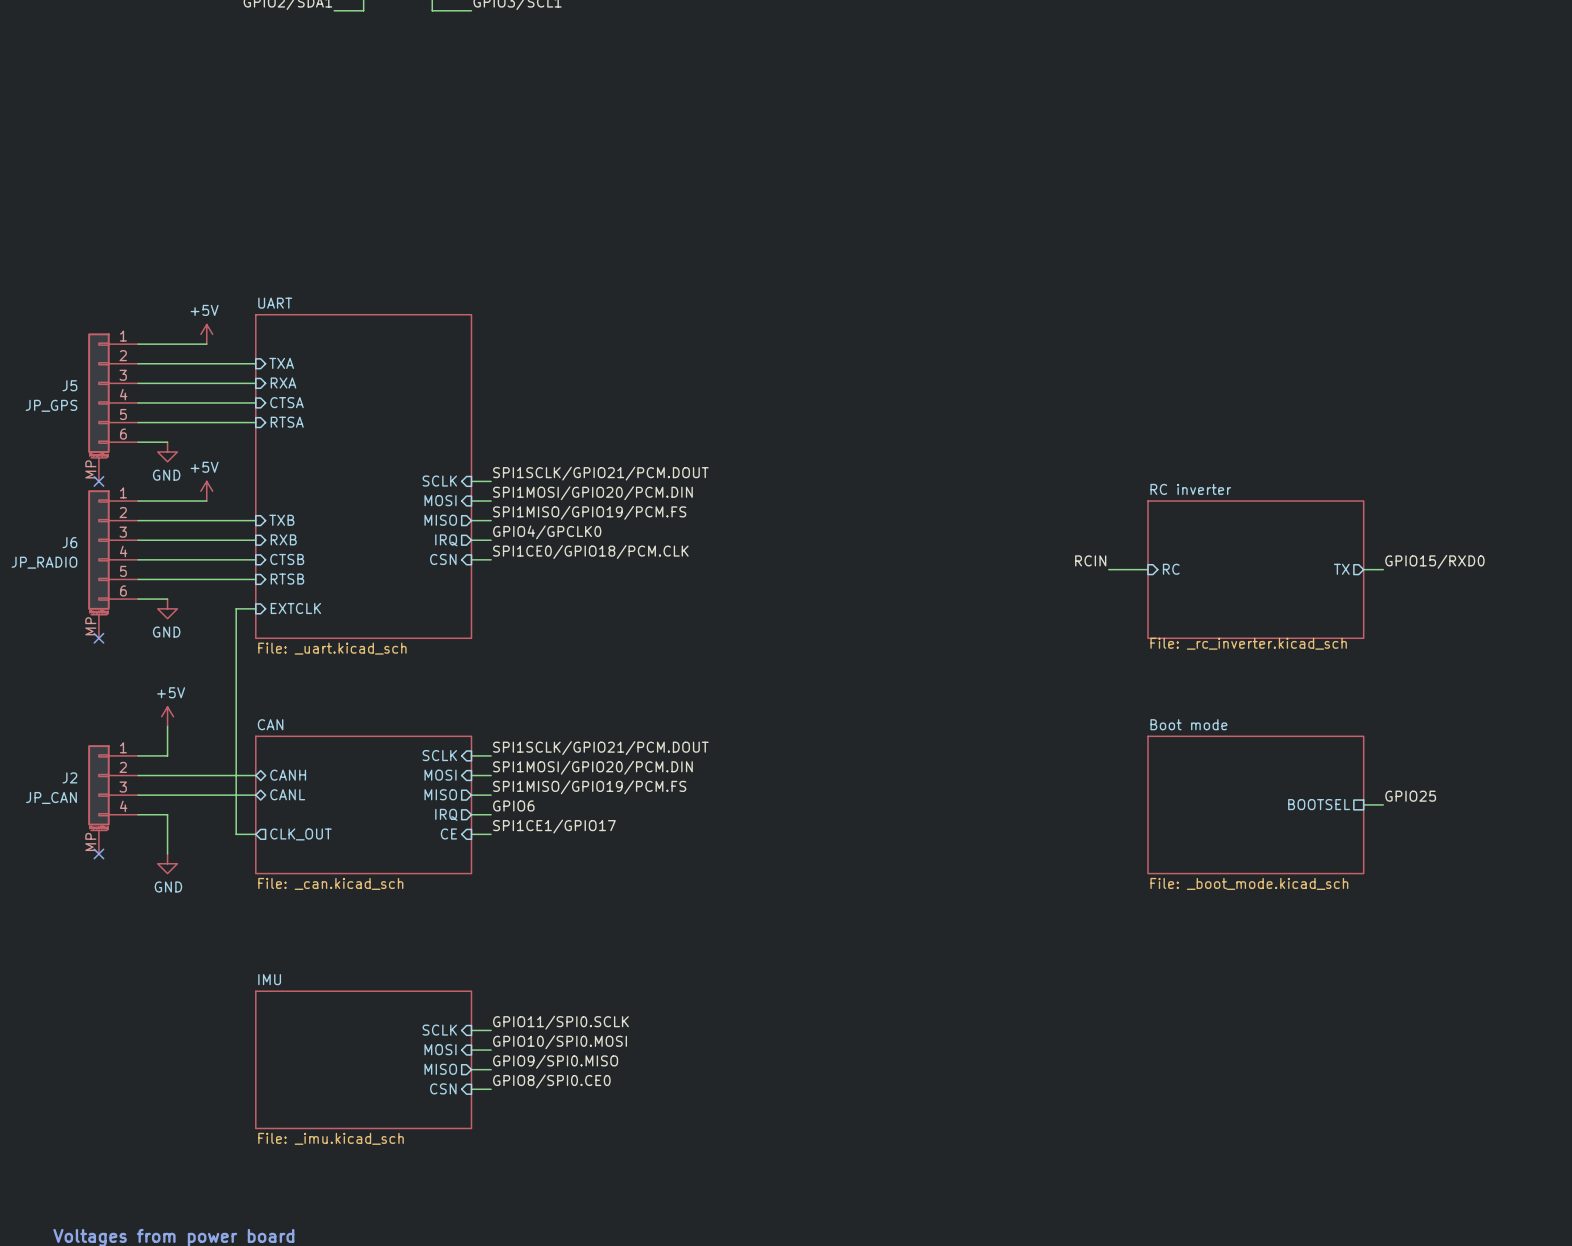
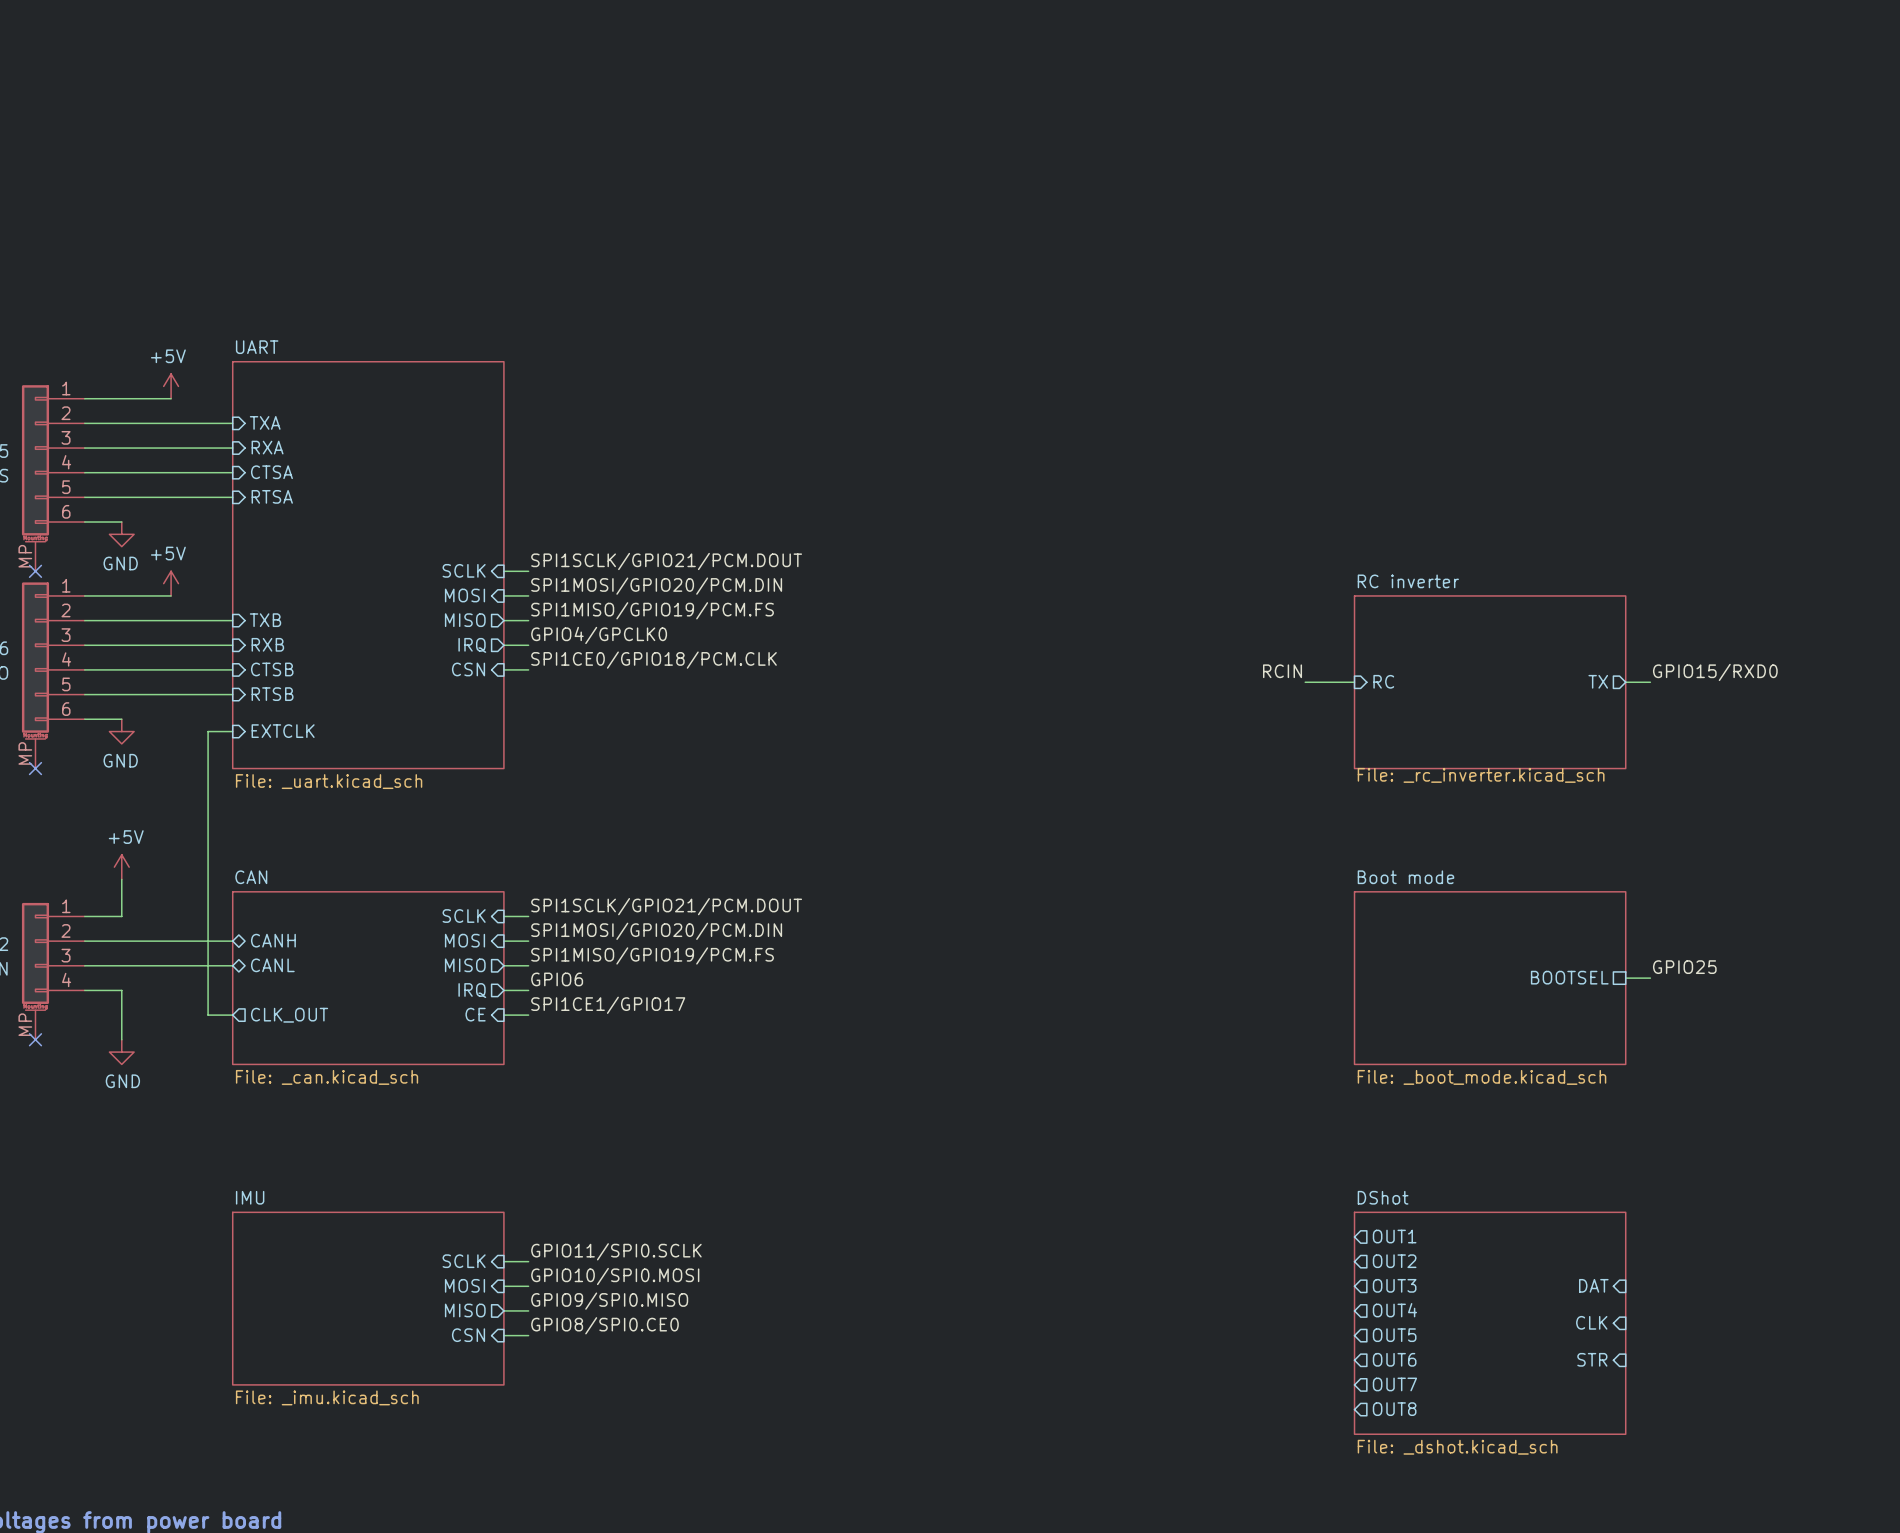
sheet pin: none -> OUT1 (1394, 1236)
sheet pin: none -> OUT2 (1394, 1261)
sheet pin: none -> OUT3 (1394, 1285)
sheet pin: none -> DAT (1593, 1285)
sheet pin: none -> OUT4 (1394, 1310)
sheet DShot: none -> File: _dshot.kicad_sch (1490, 1323)
sheet pin: none -> CLK (1591, 1322)
sheet pin: none -> OUT5 (1394, 1335)
sheet pin: none -> OUT6 (1394, 1359)
sheet pin: none -> STR (1592, 1359)
sheet pin: none -> OUT7 (1394, 1384)
sheet pin: none -> OUT8 (1394, 1409)

